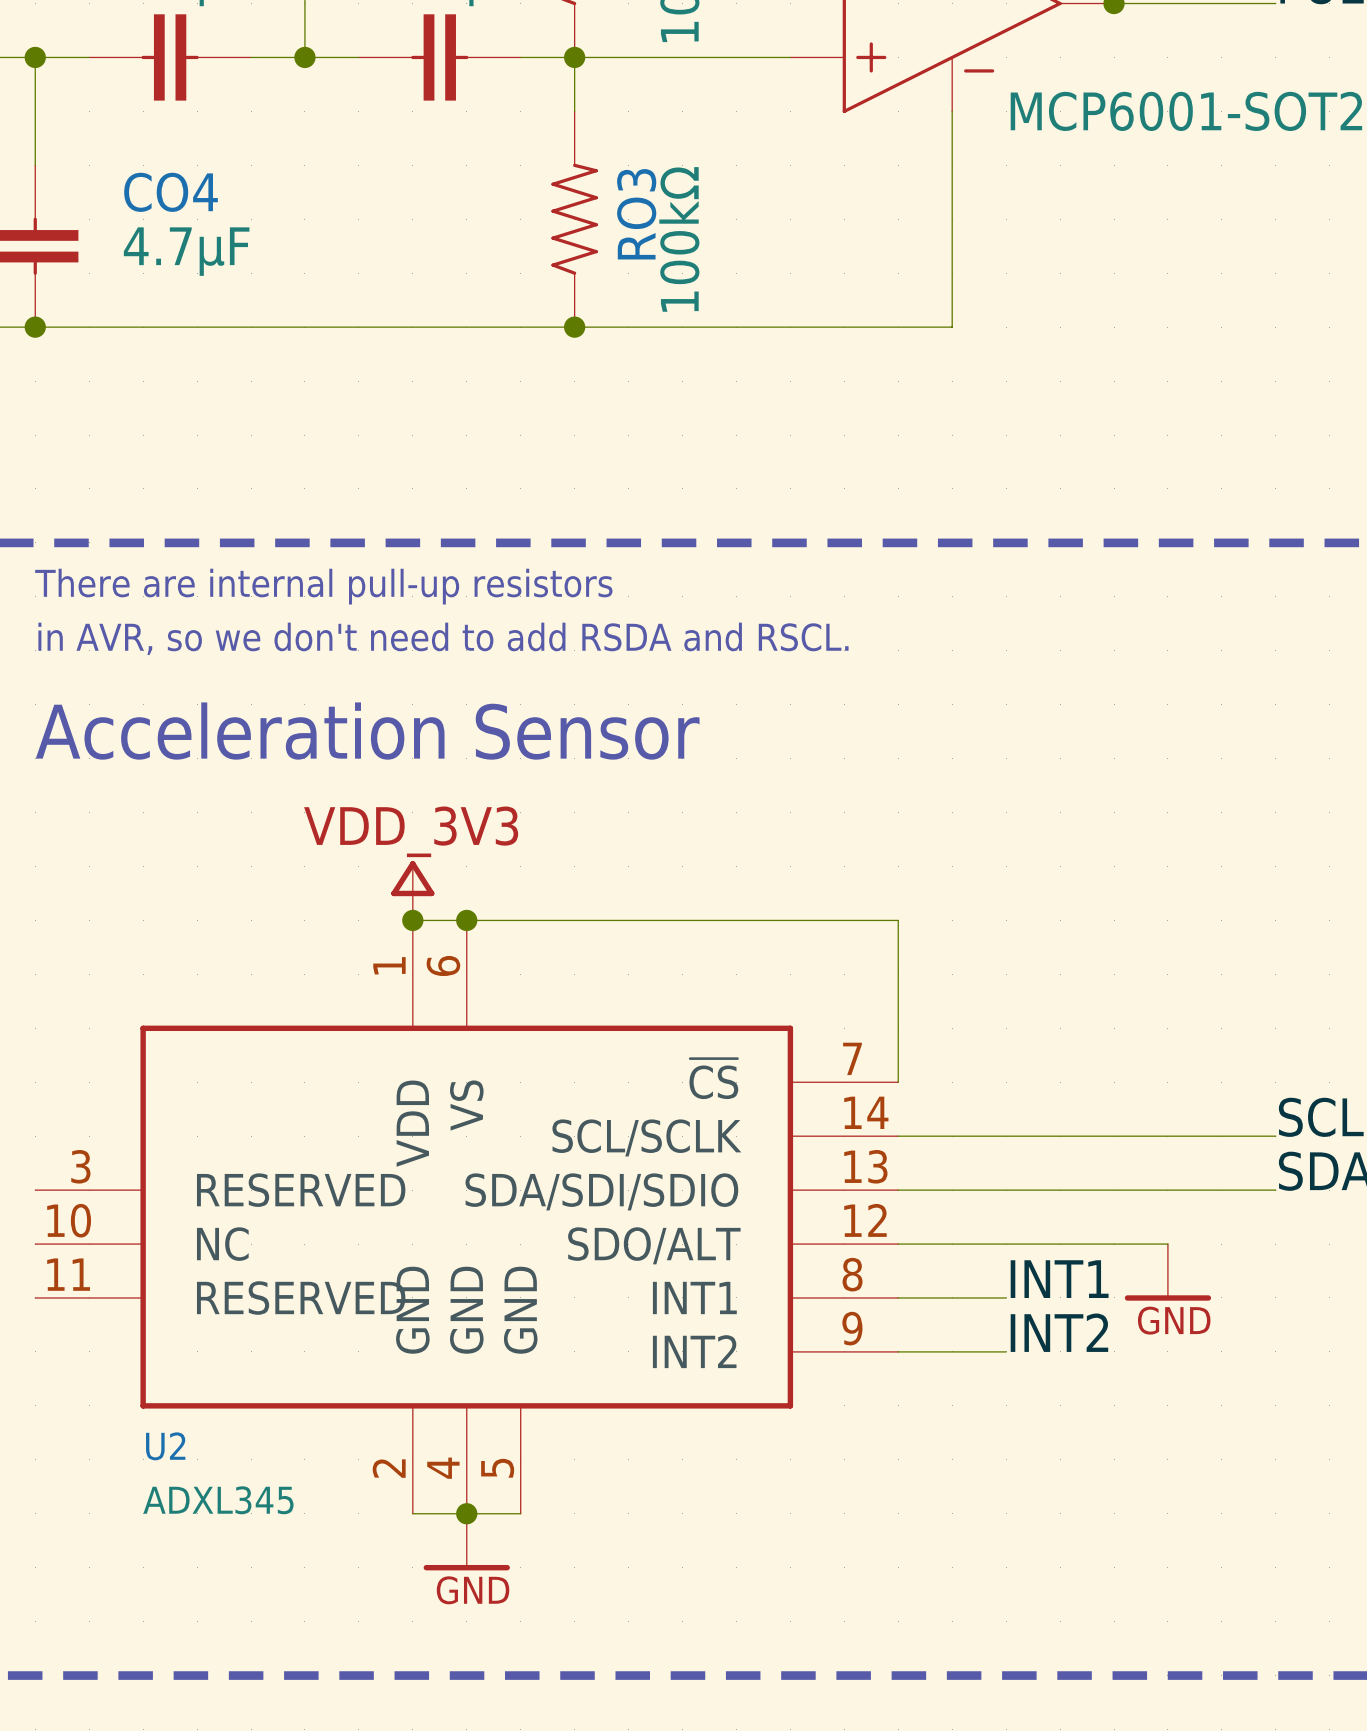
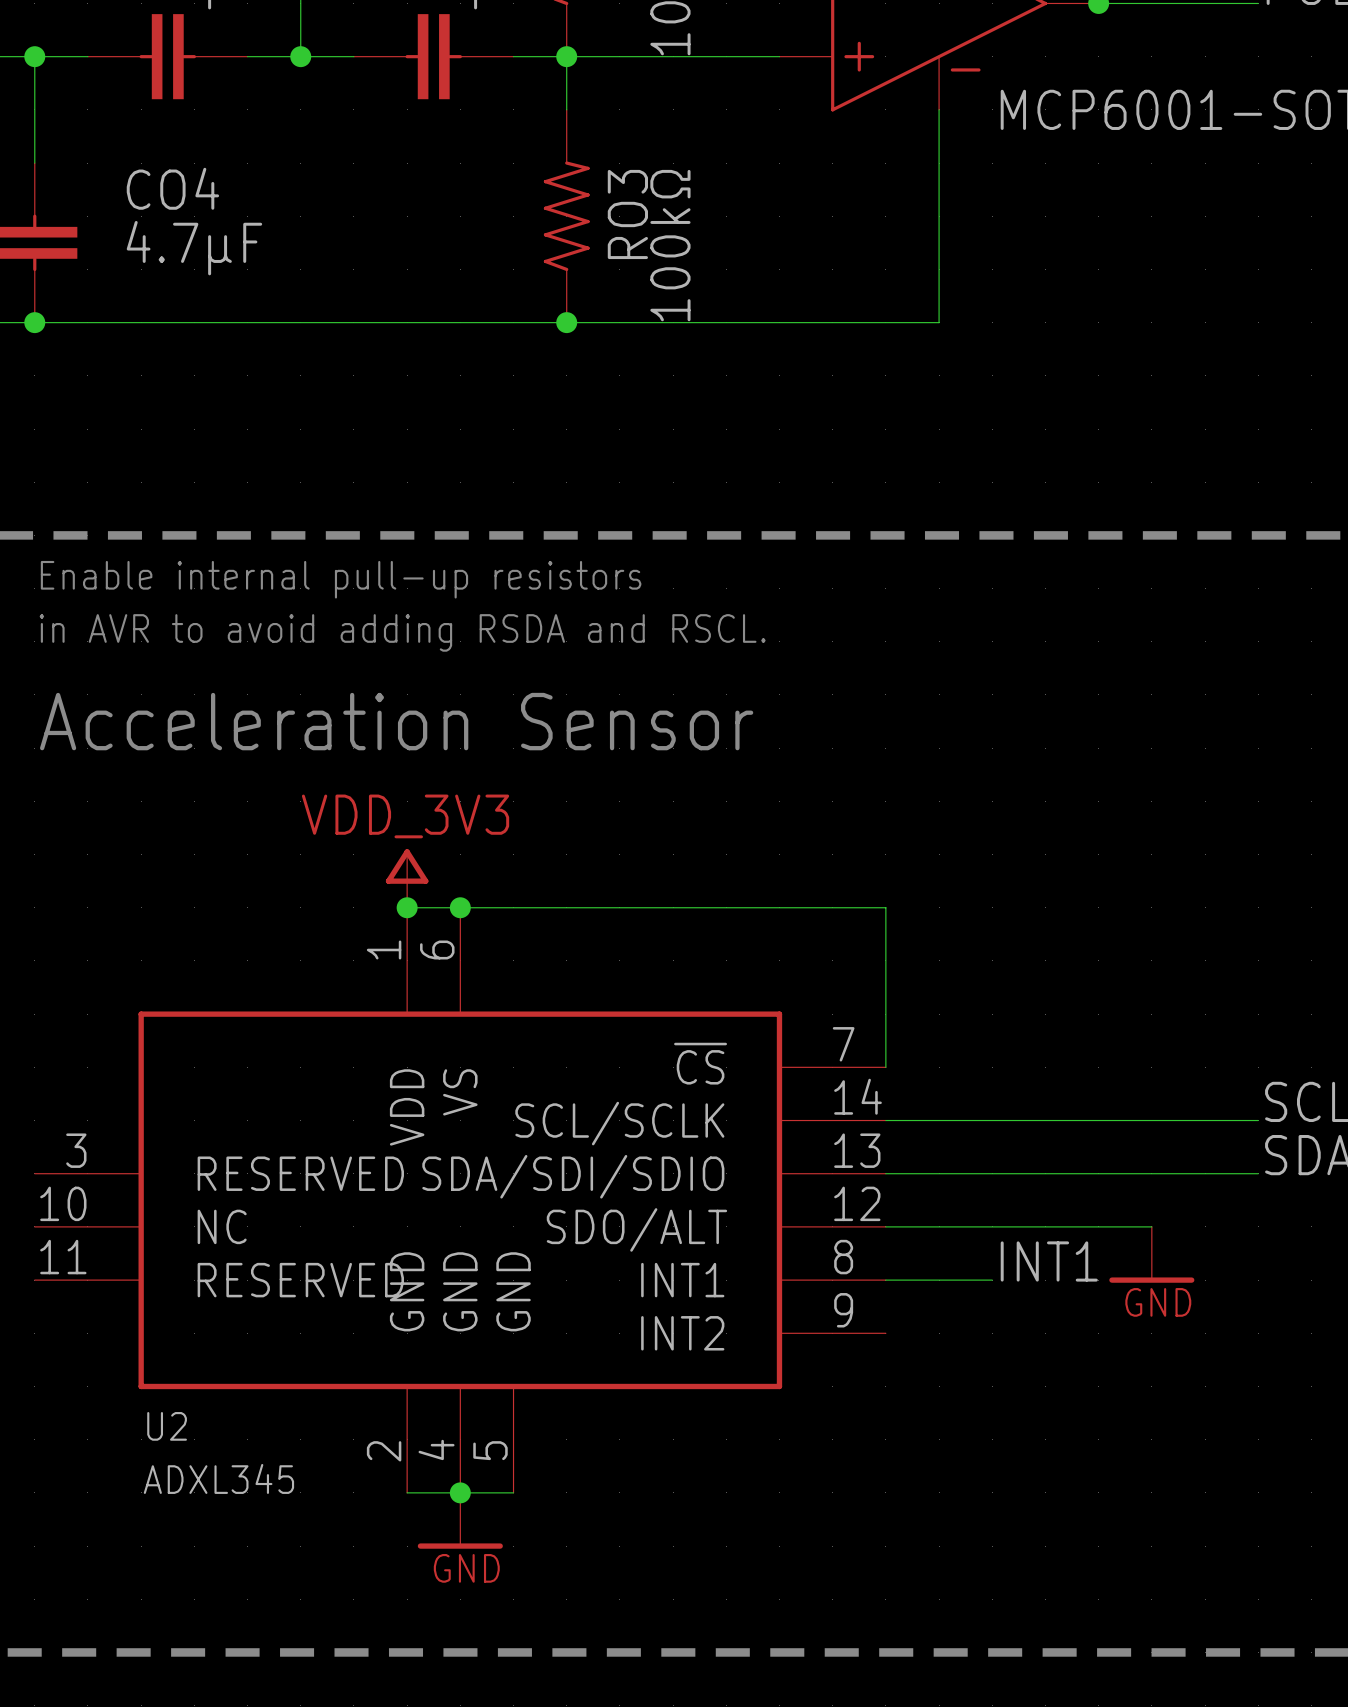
text: There are internal pull-up resistors (323, 586) -> Enable internal pull-up resistors (341, 579)
text: in AVR, so we don't need to add RSDA and RSCL. (443, 638) -> in AVR to avoid adding RSDA and RSCL. (402, 632)
label: INT2 (1059, 1332) -> none
wire: (898, 1351) (1006, 1351) -> none

